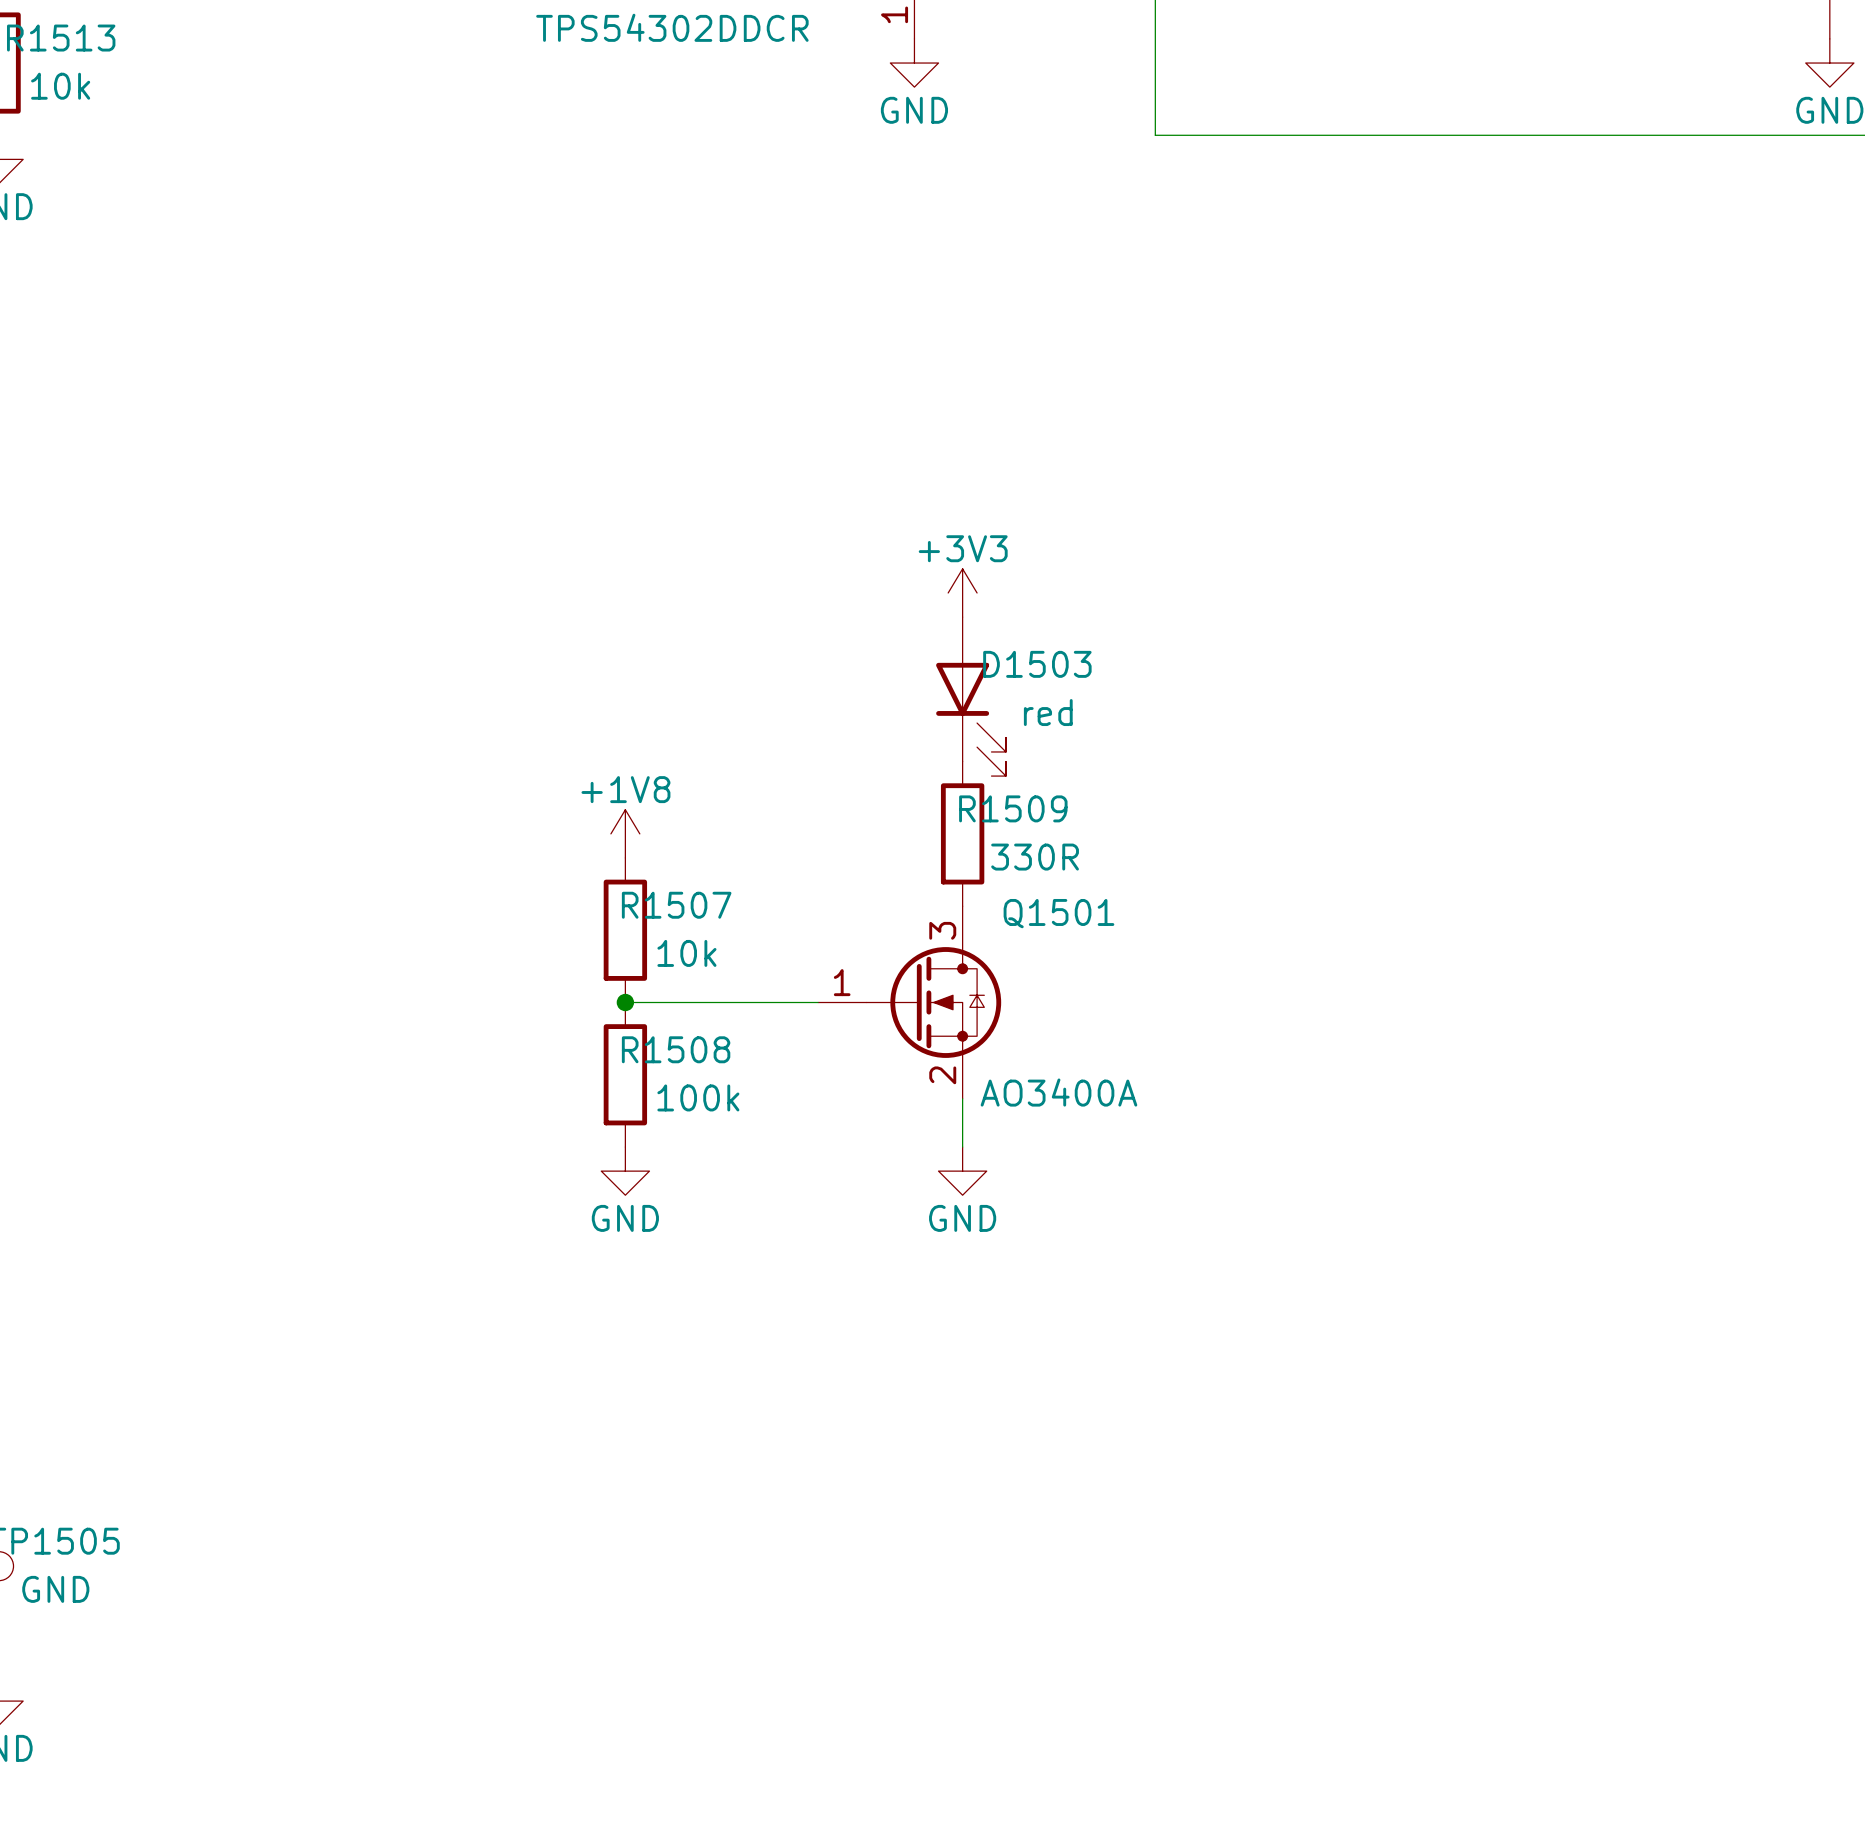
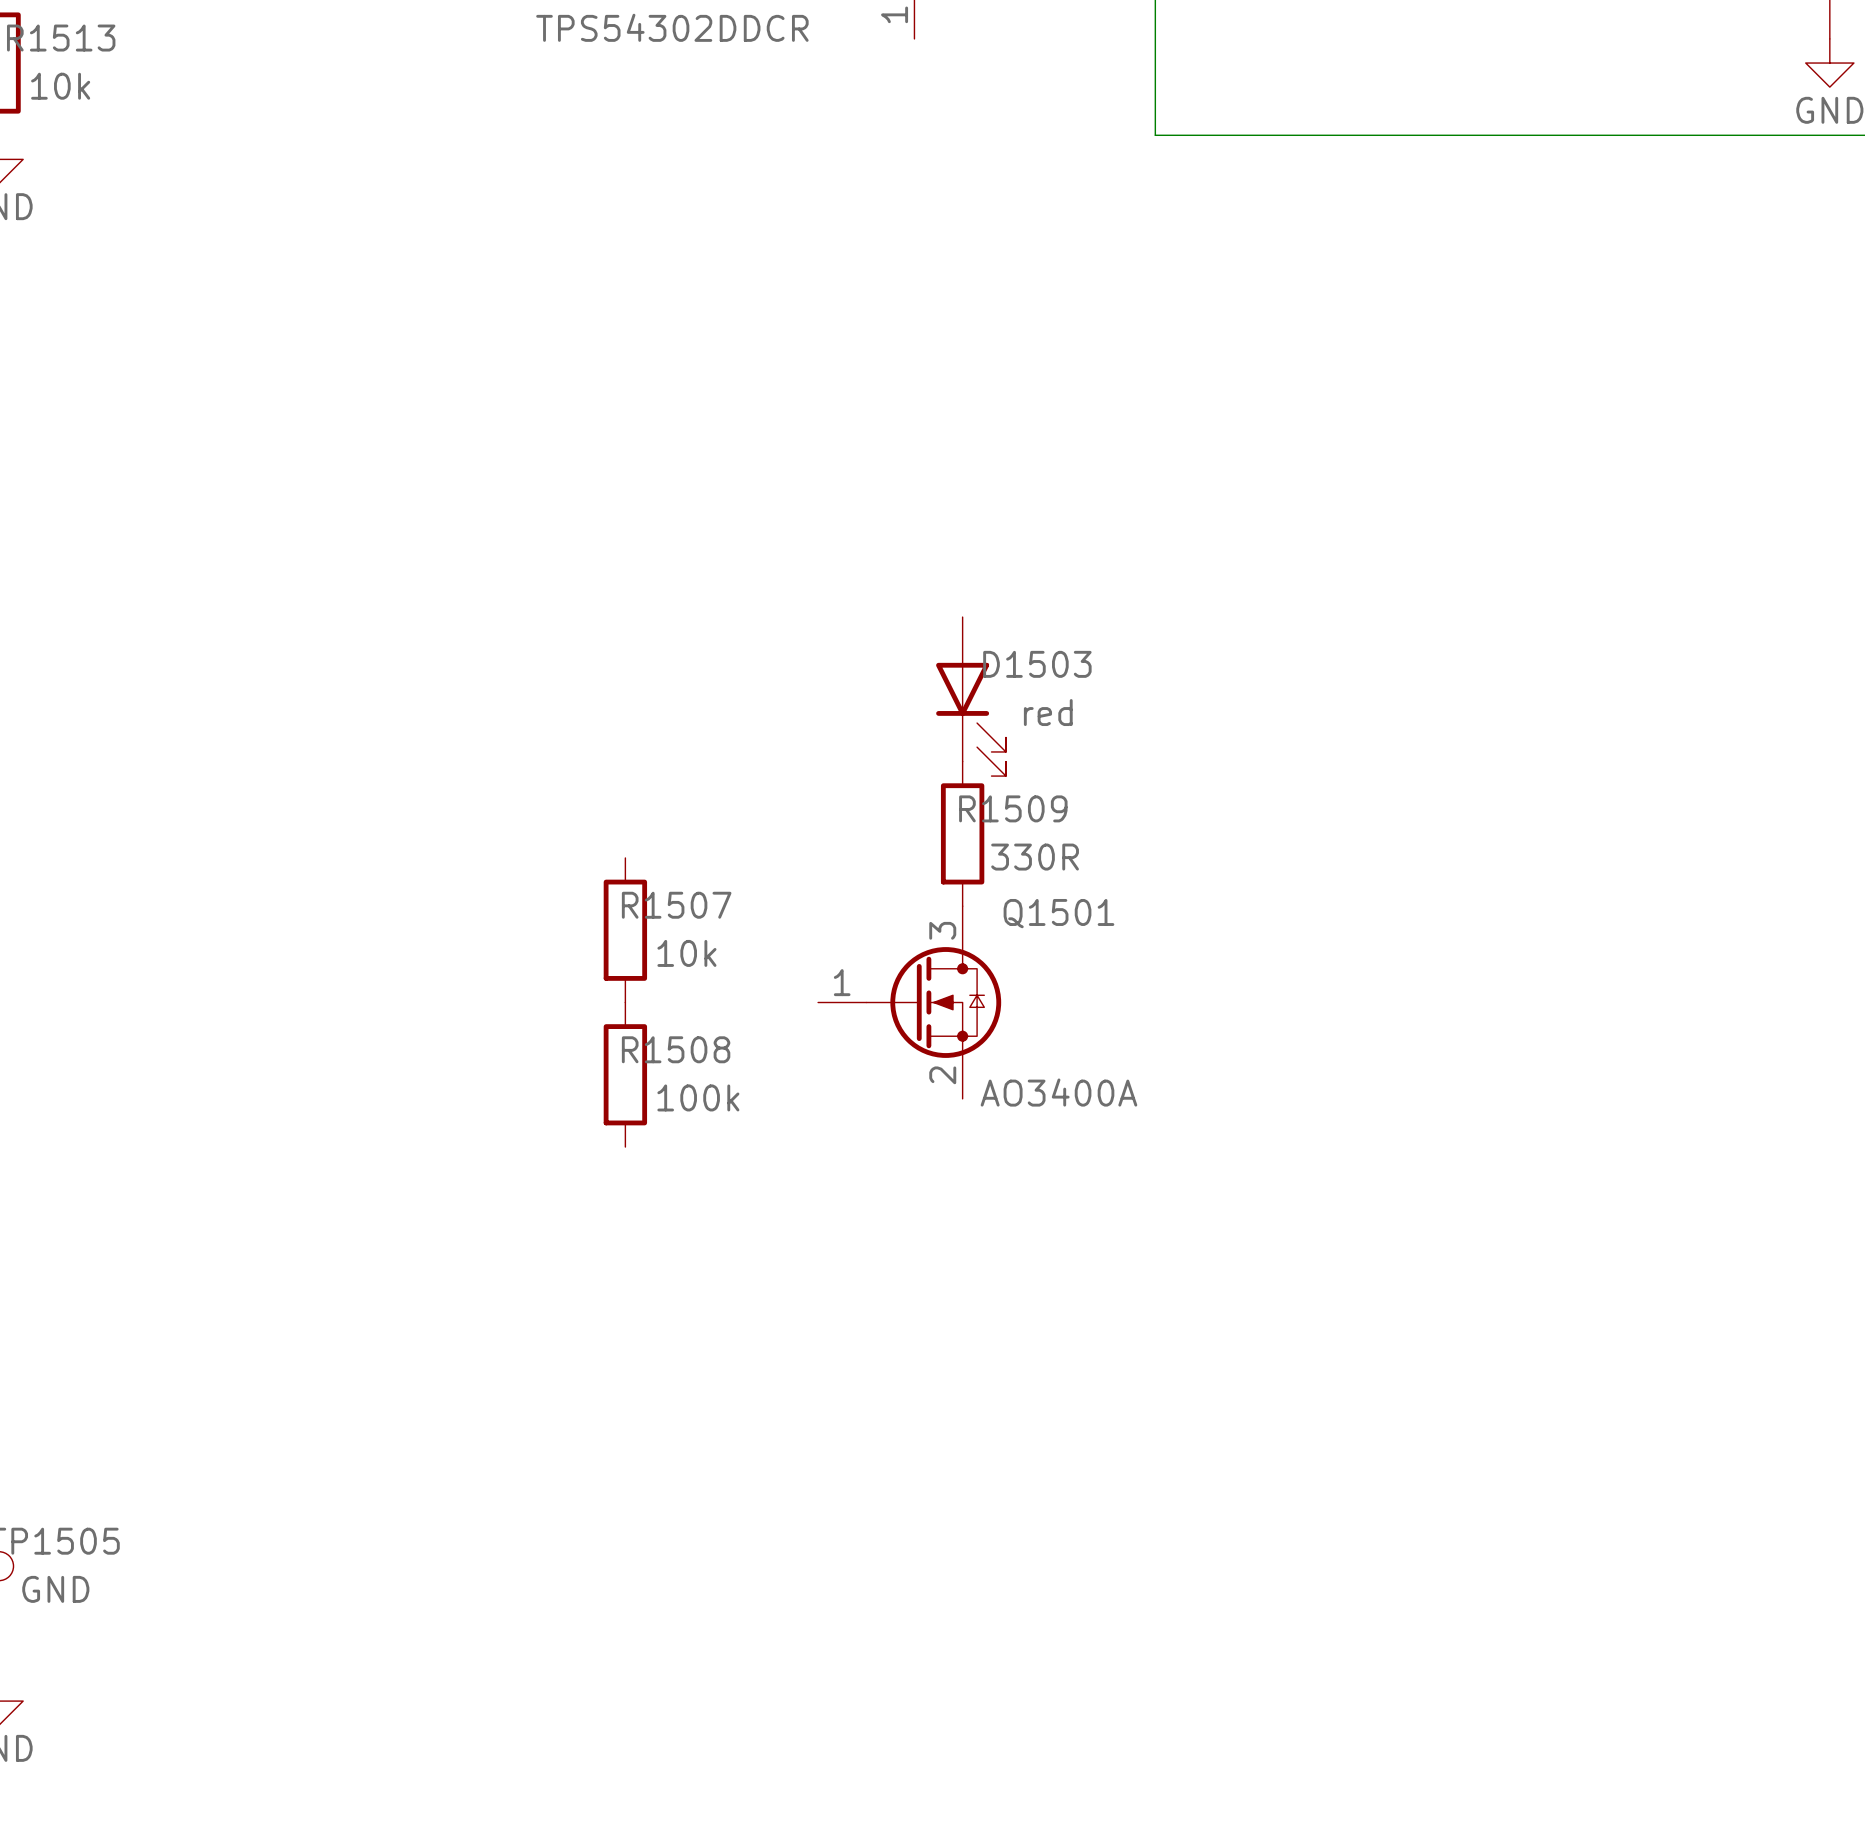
power symbol: GND (914, 63) -> none
power symbol: +3V3 (962, 592) -> none
power symbol: +1V8 (625, 833) -> none
wire: (625, 1002) (818, 1002) -> none
junction: (625, 1002) -> none
wire: (962, 1098) (962, 1147) -> none
power symbol: GND (625, 1171) -> none
power symbol: GND (962, 1171) -> none

